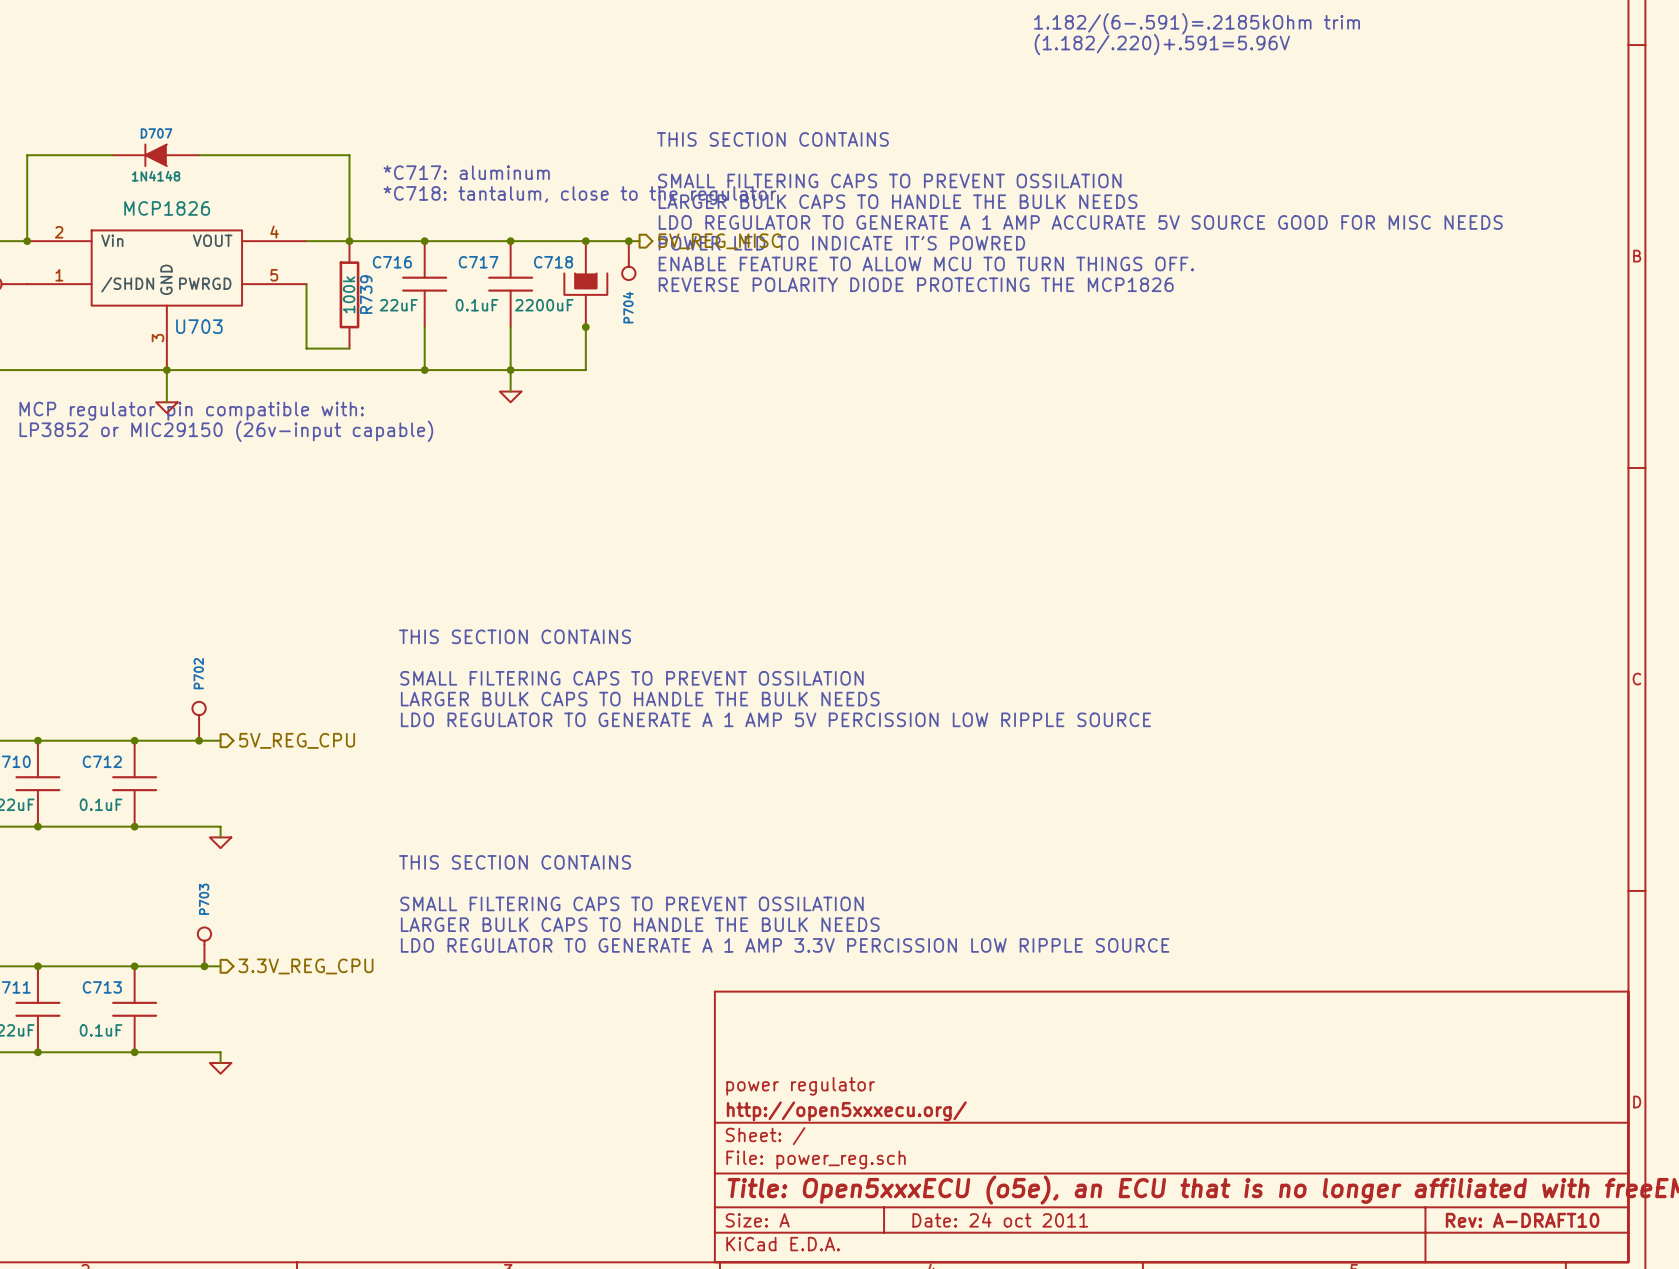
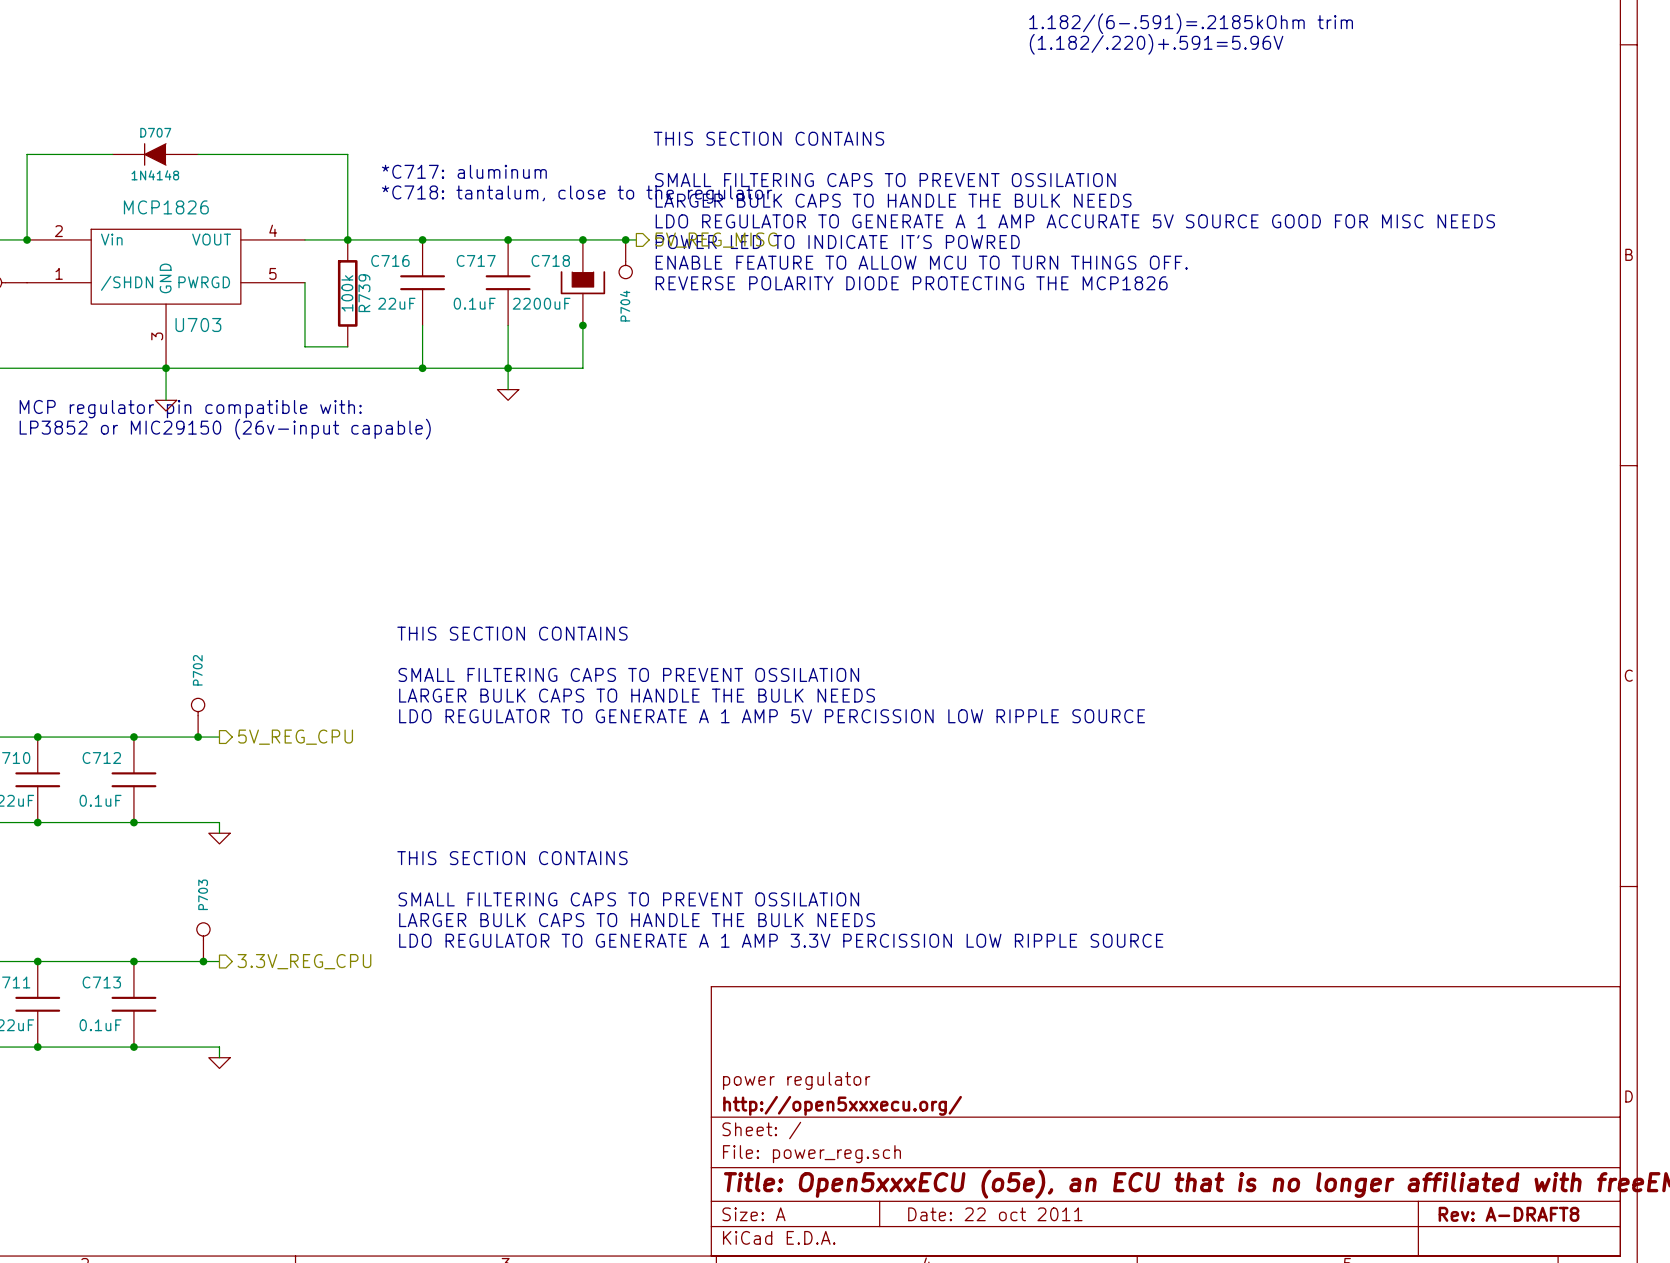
title block: Date: 24 oct 2011 (1000, 1220) -> Date: 22 oct 2011 (995, 1214)
title block: Rev: A-DRAFT10 (1522, 1220) -> Rev: A-DRAFT8 (1509, 1214)

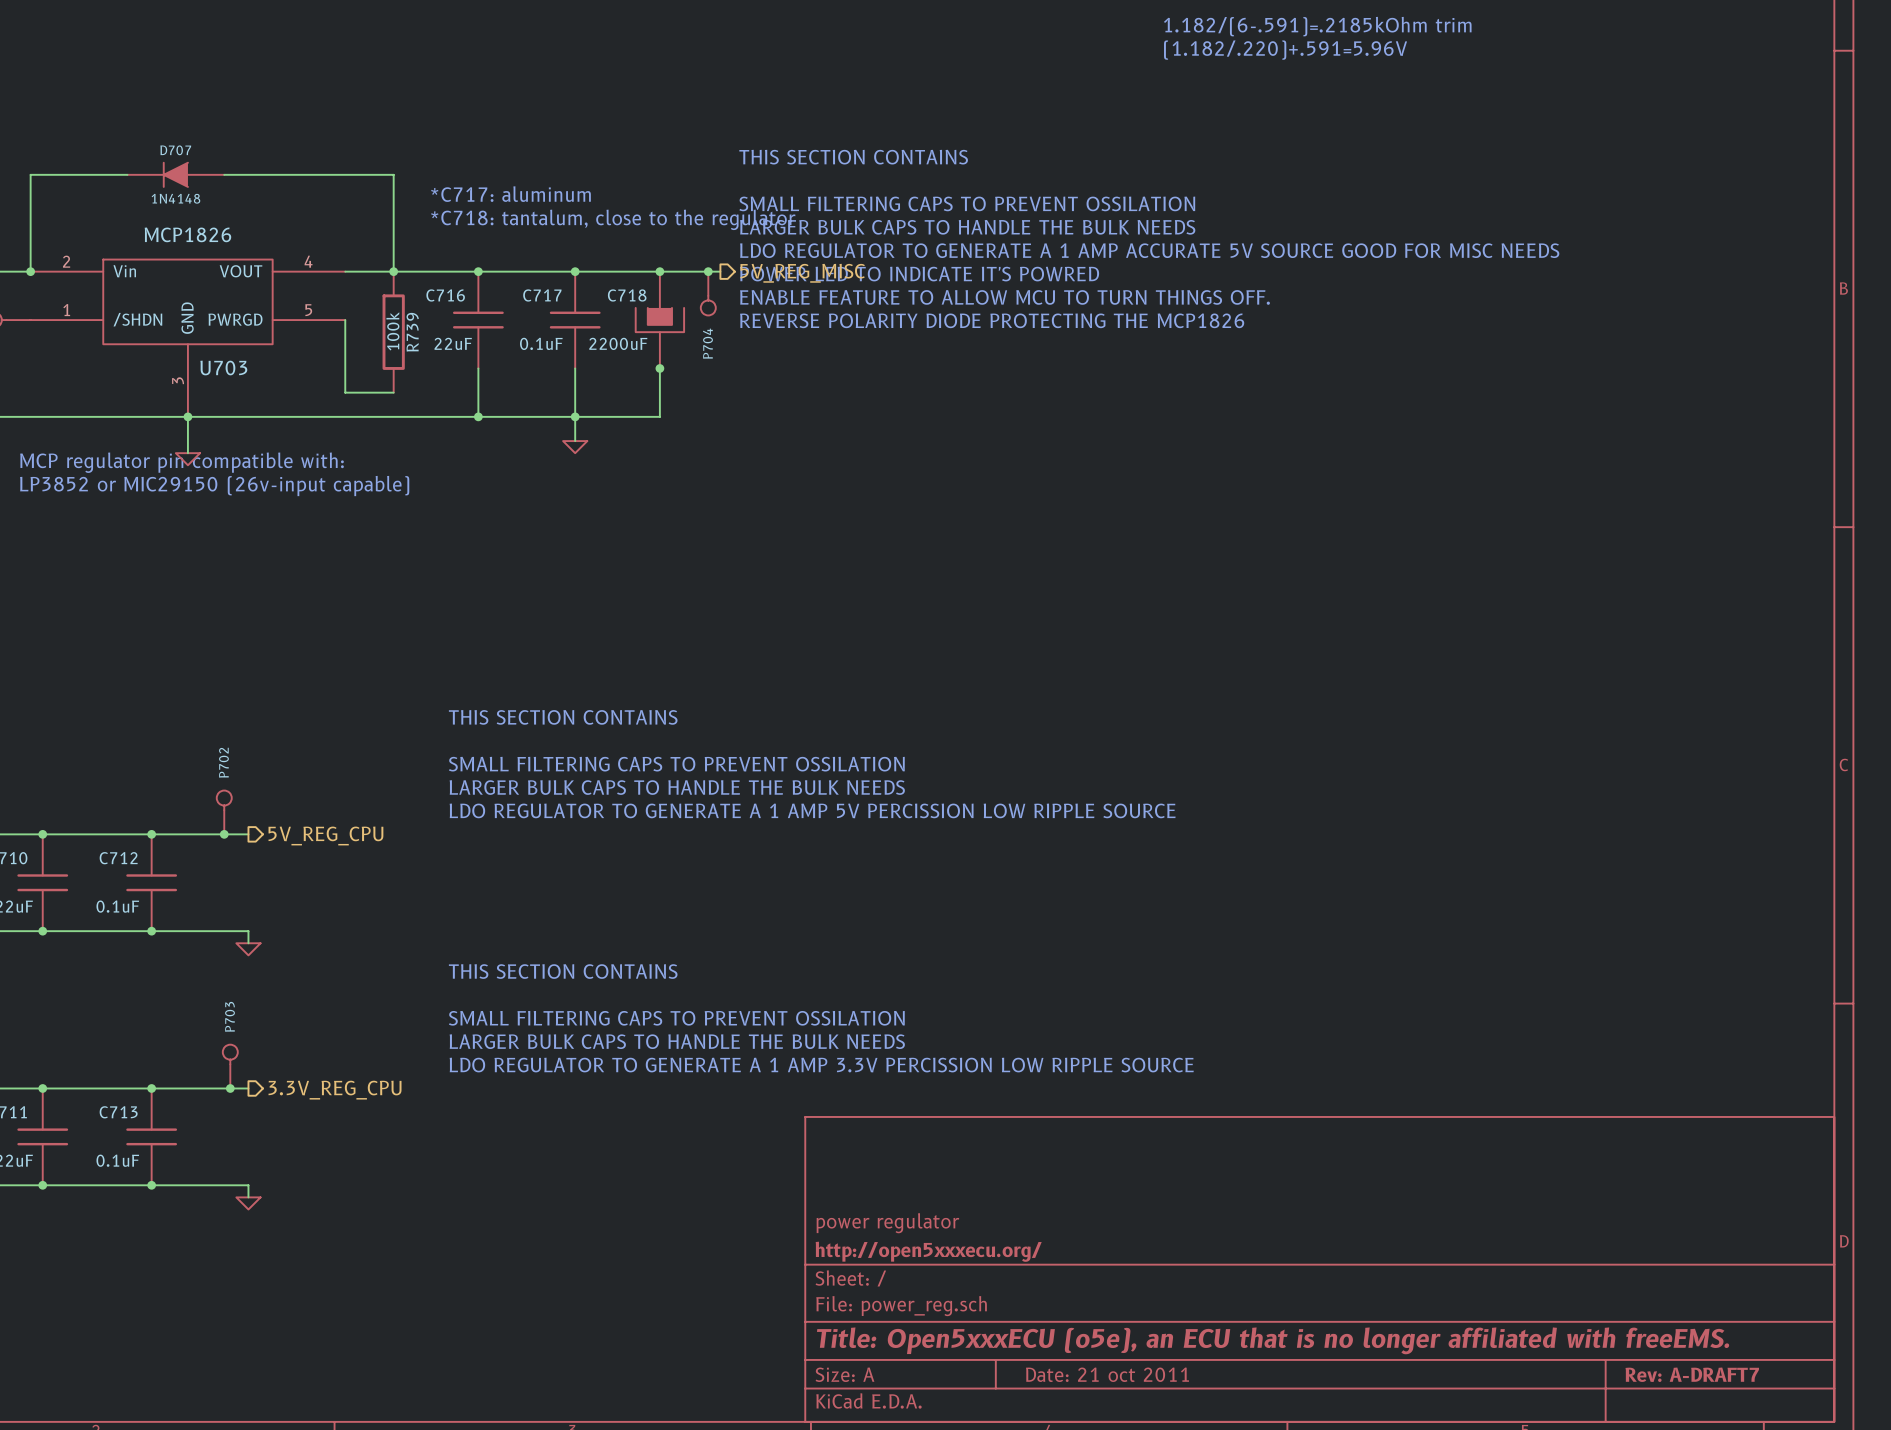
title block: Date: 22 oct 2011 (995, 1214) -> Date: 21 oct 2011 (1107, 1374)
title block: Rev: A-DRAFT8 (1509, 1214) -> Rev: A-DRAFT7 (1692, 1374)

